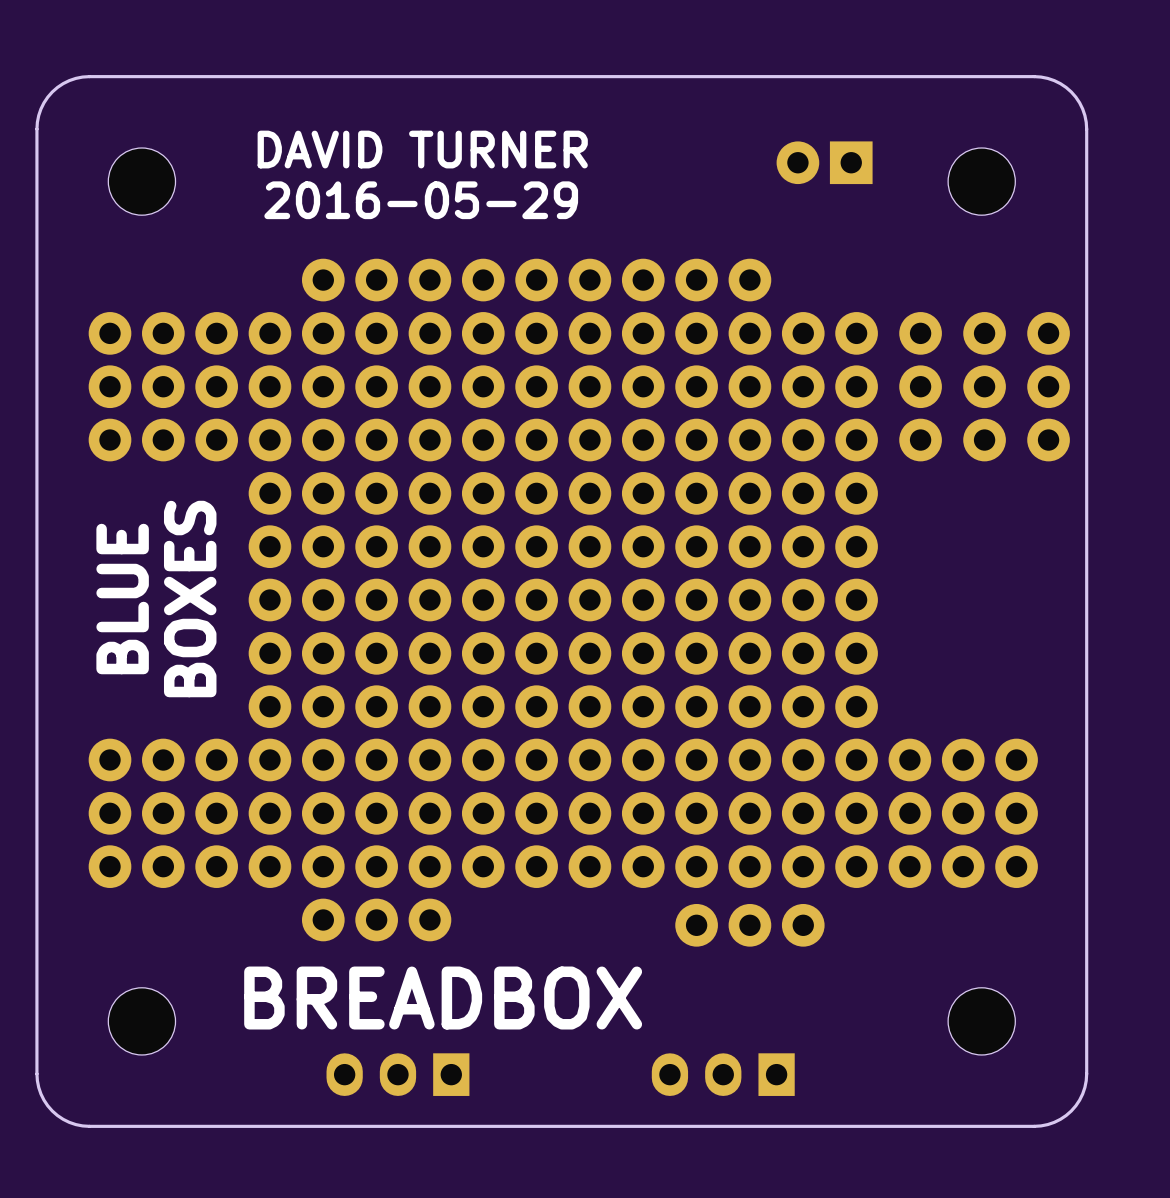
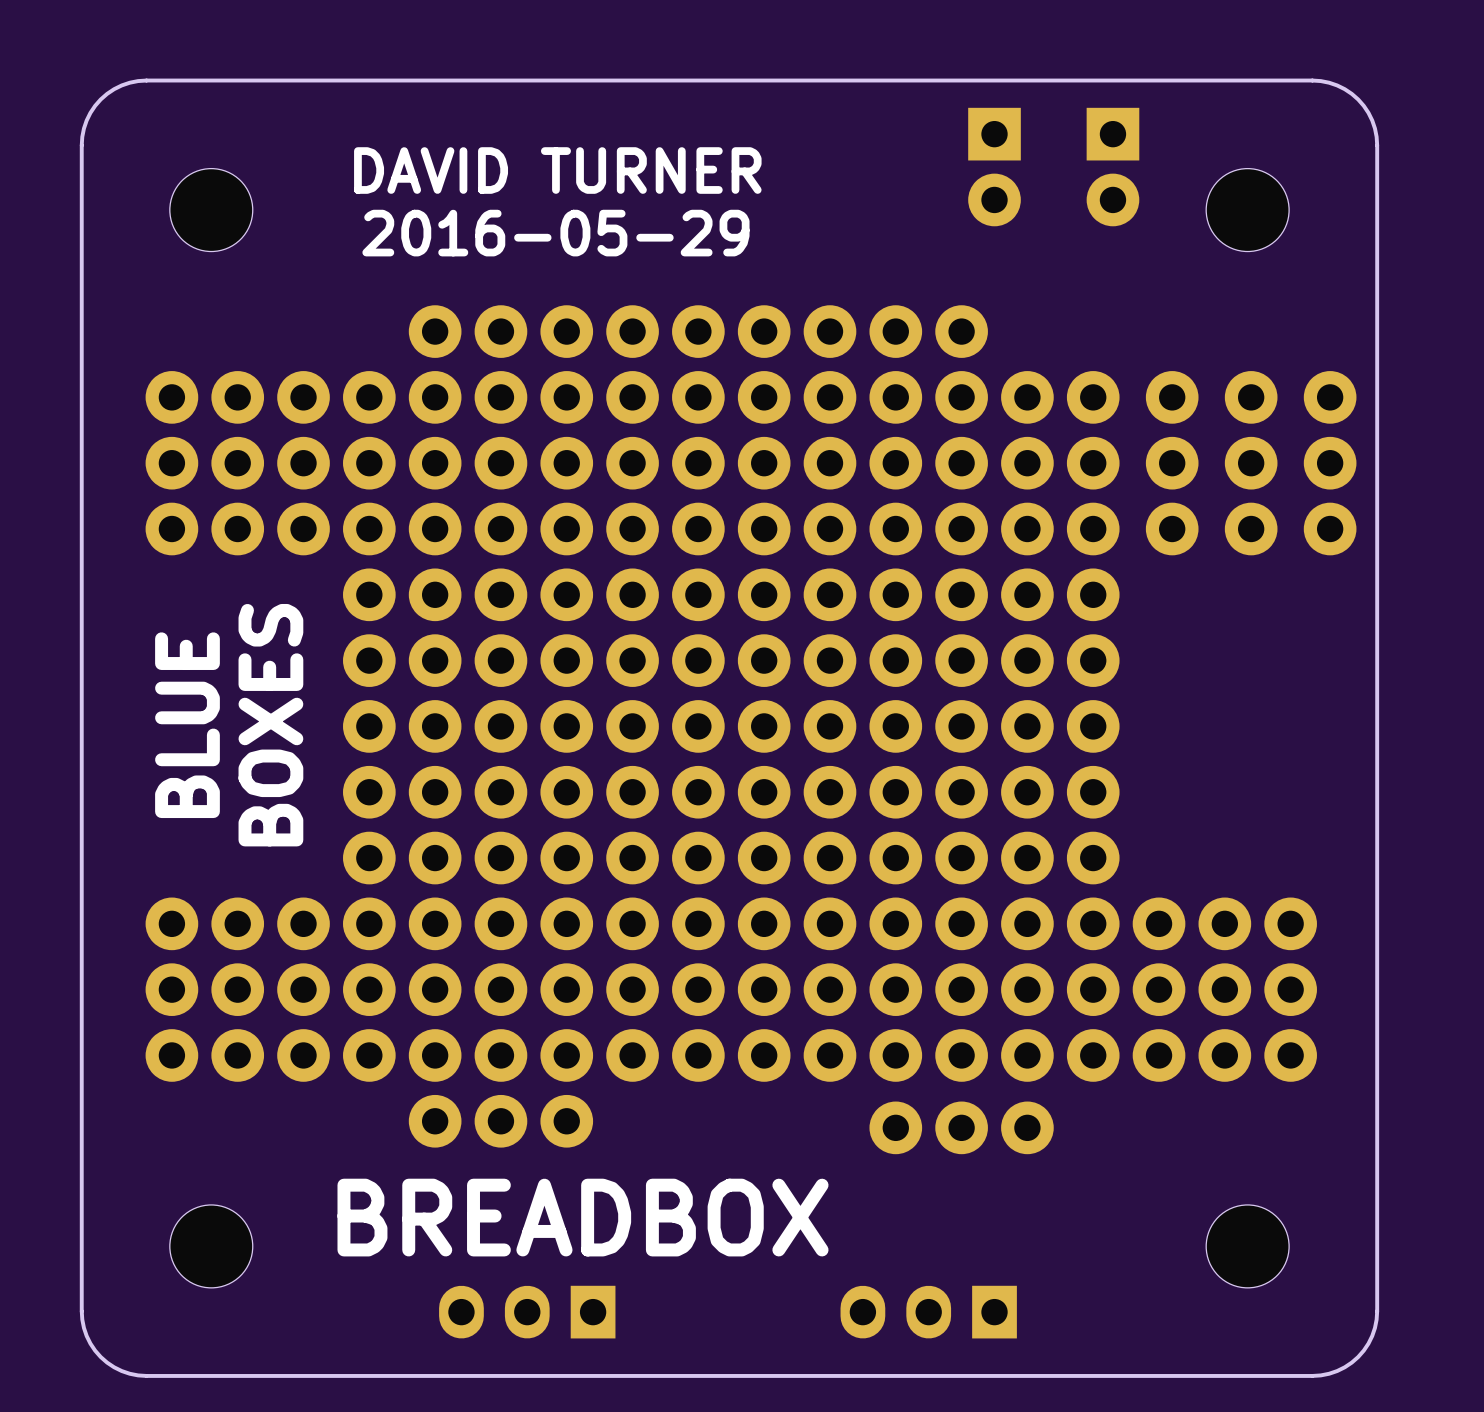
part: none -> (994, 167)
part: none -> (1112, 167)
part: (824, 162) -> none

